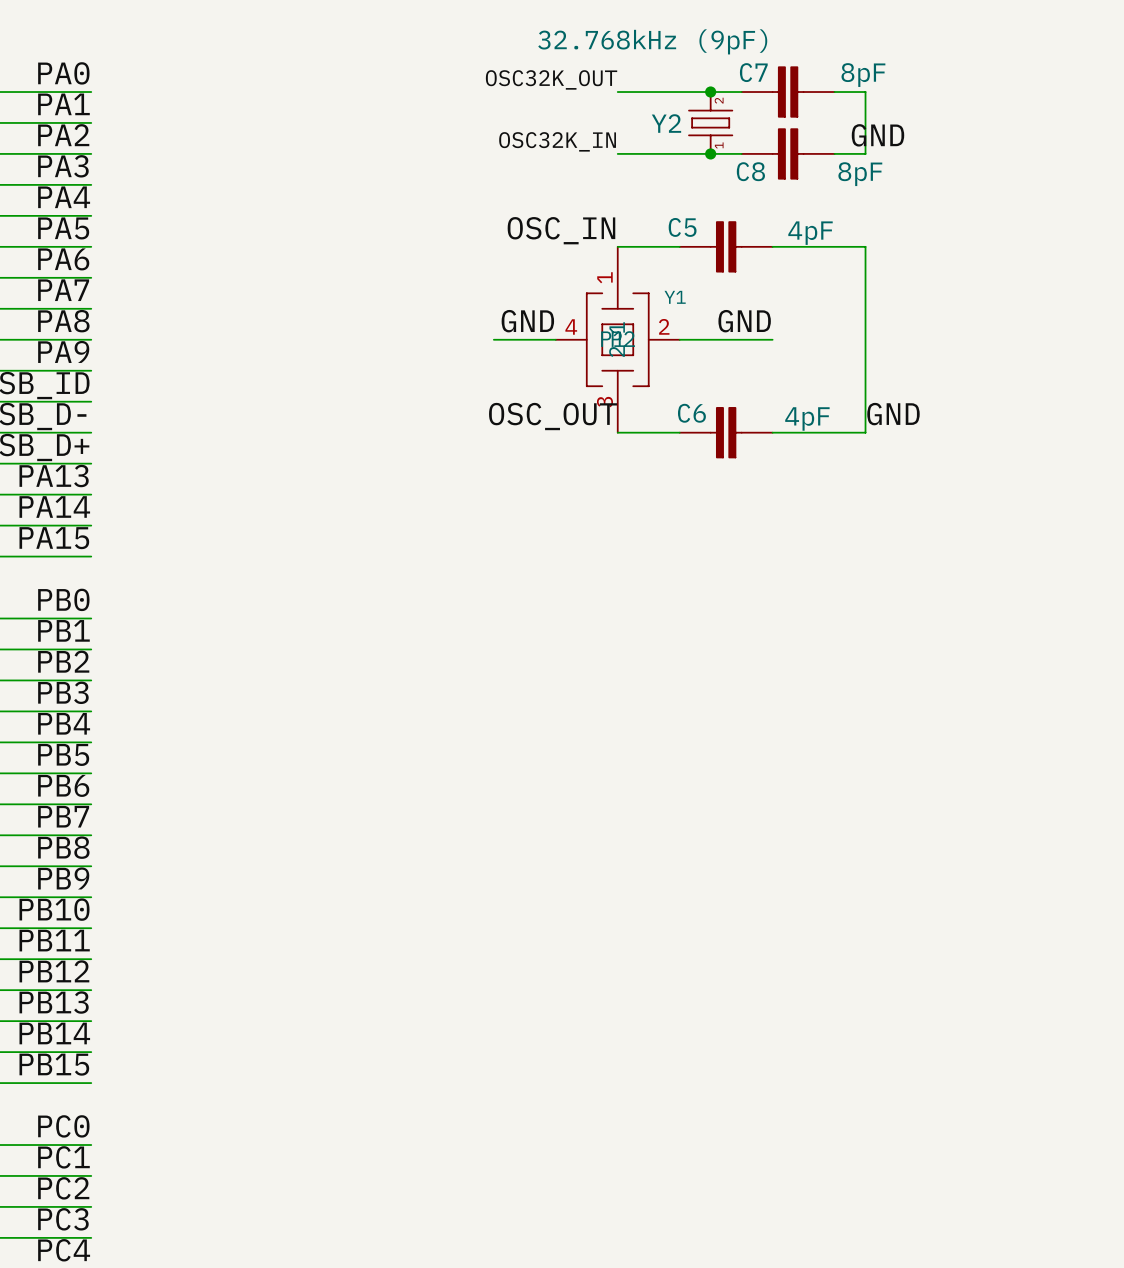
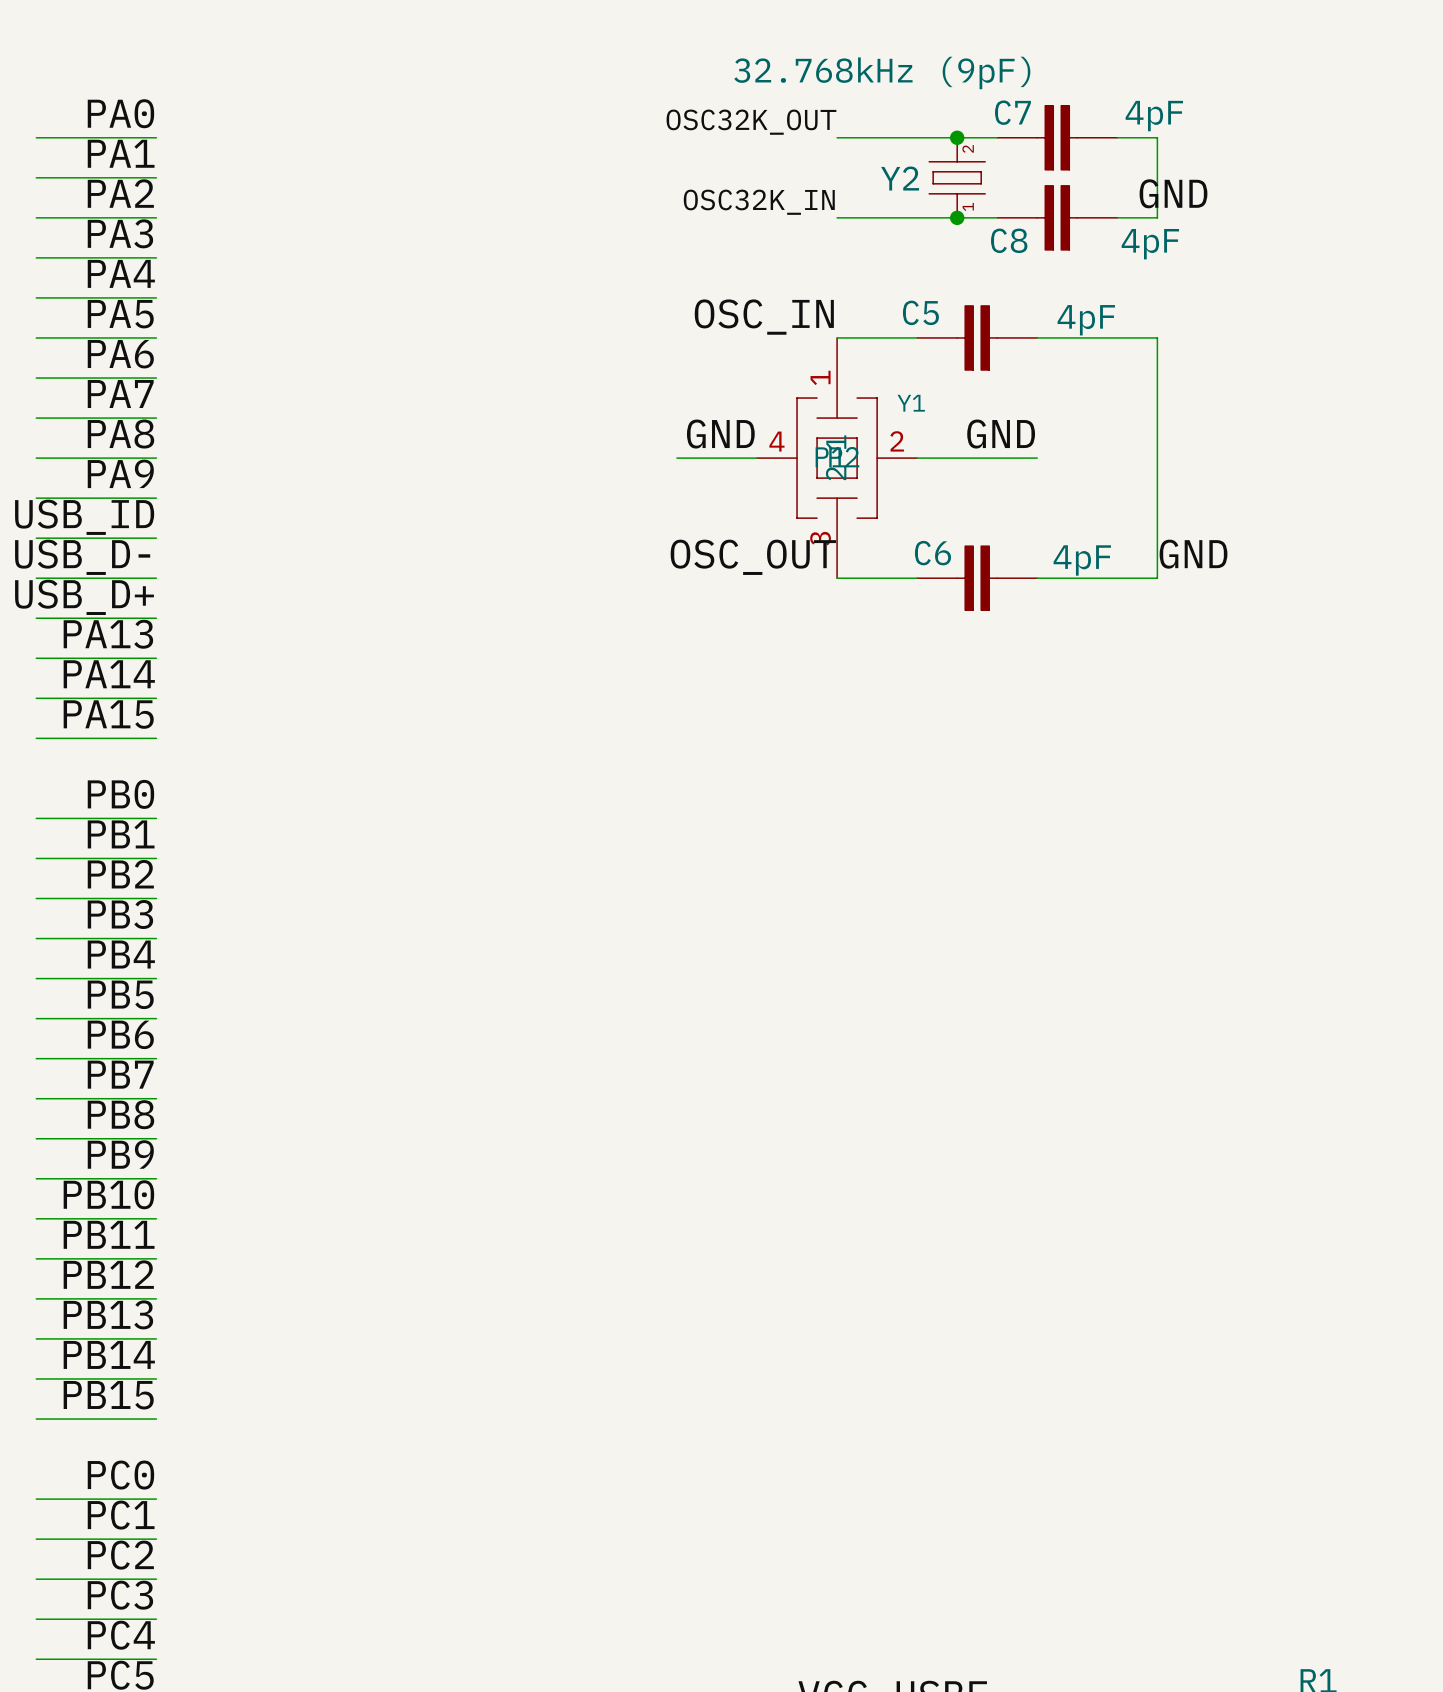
C7 value: 8pF (863, 75) -> 4pF (1154, 116)
C8 value: 8pF (860, 174) -> 4pF (1150, 244)

